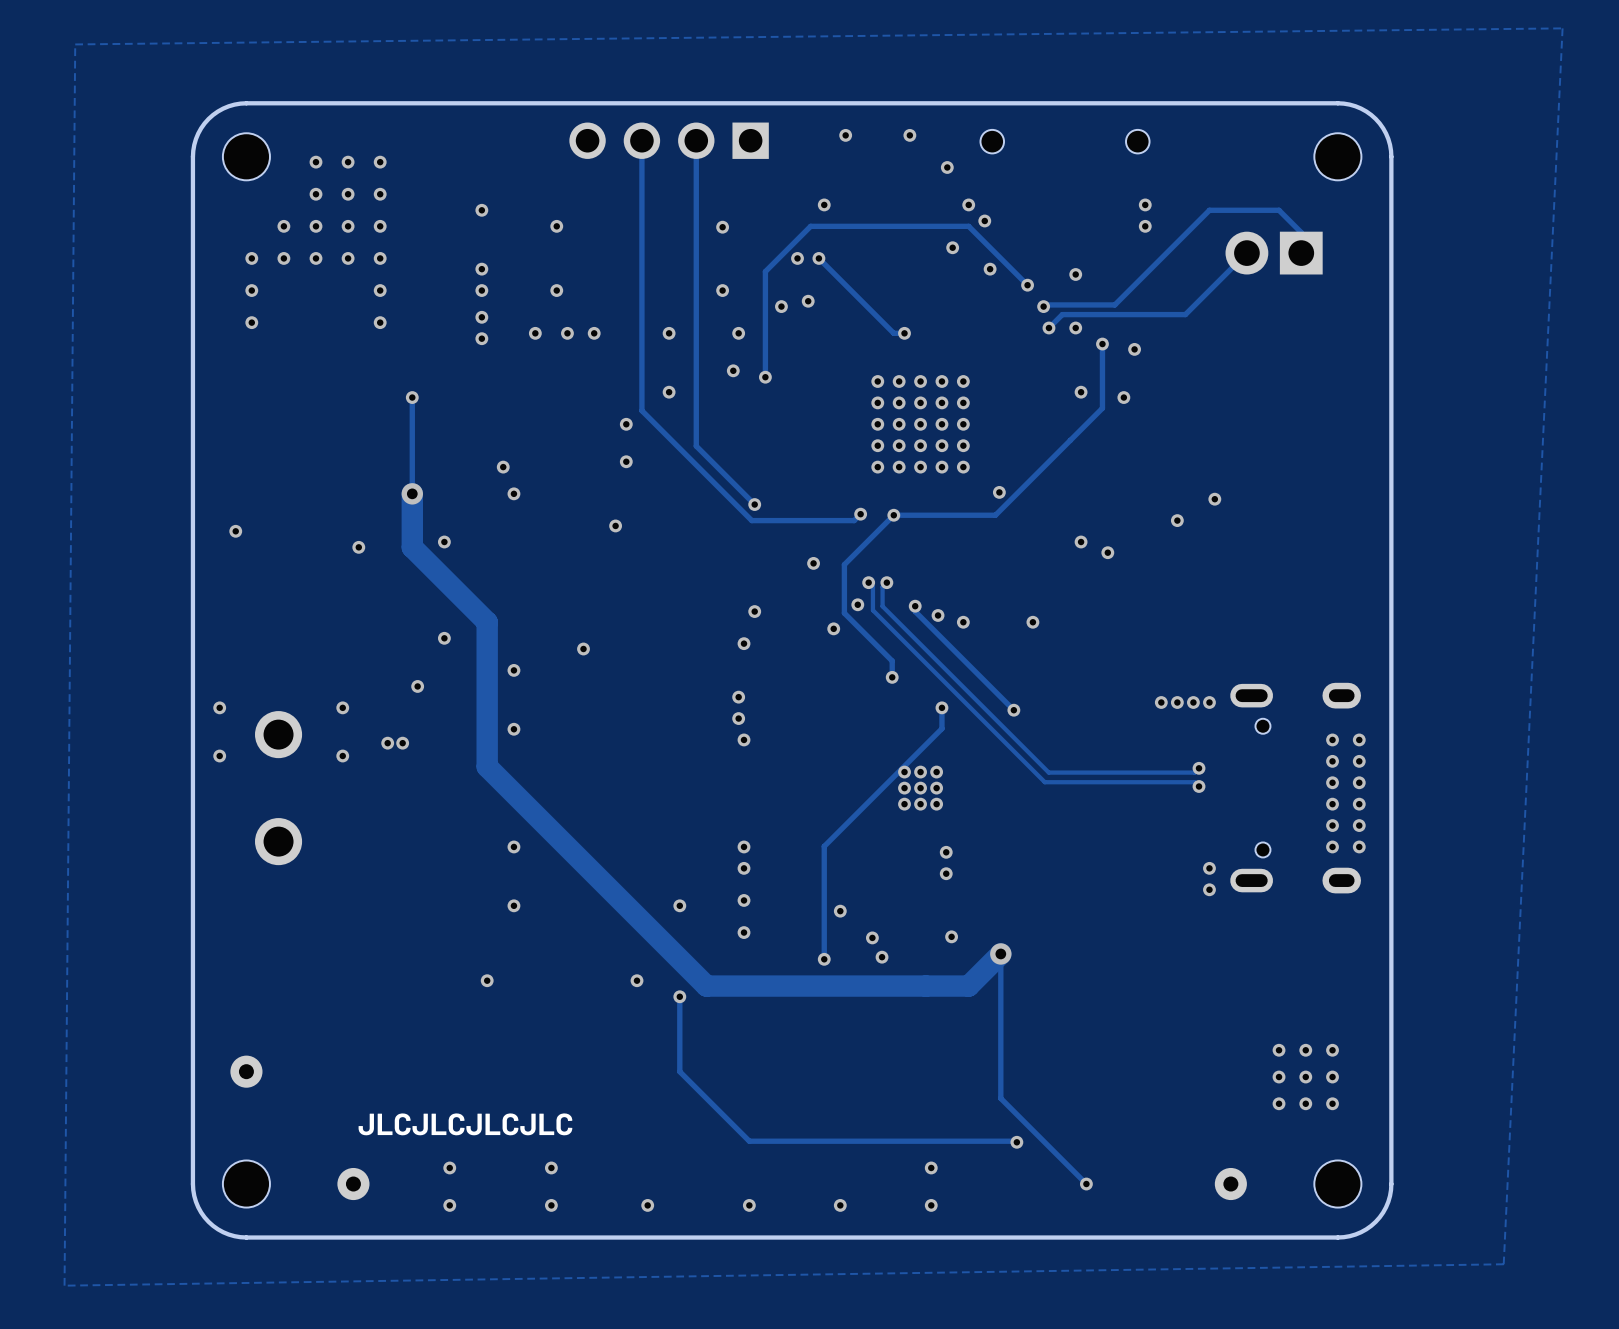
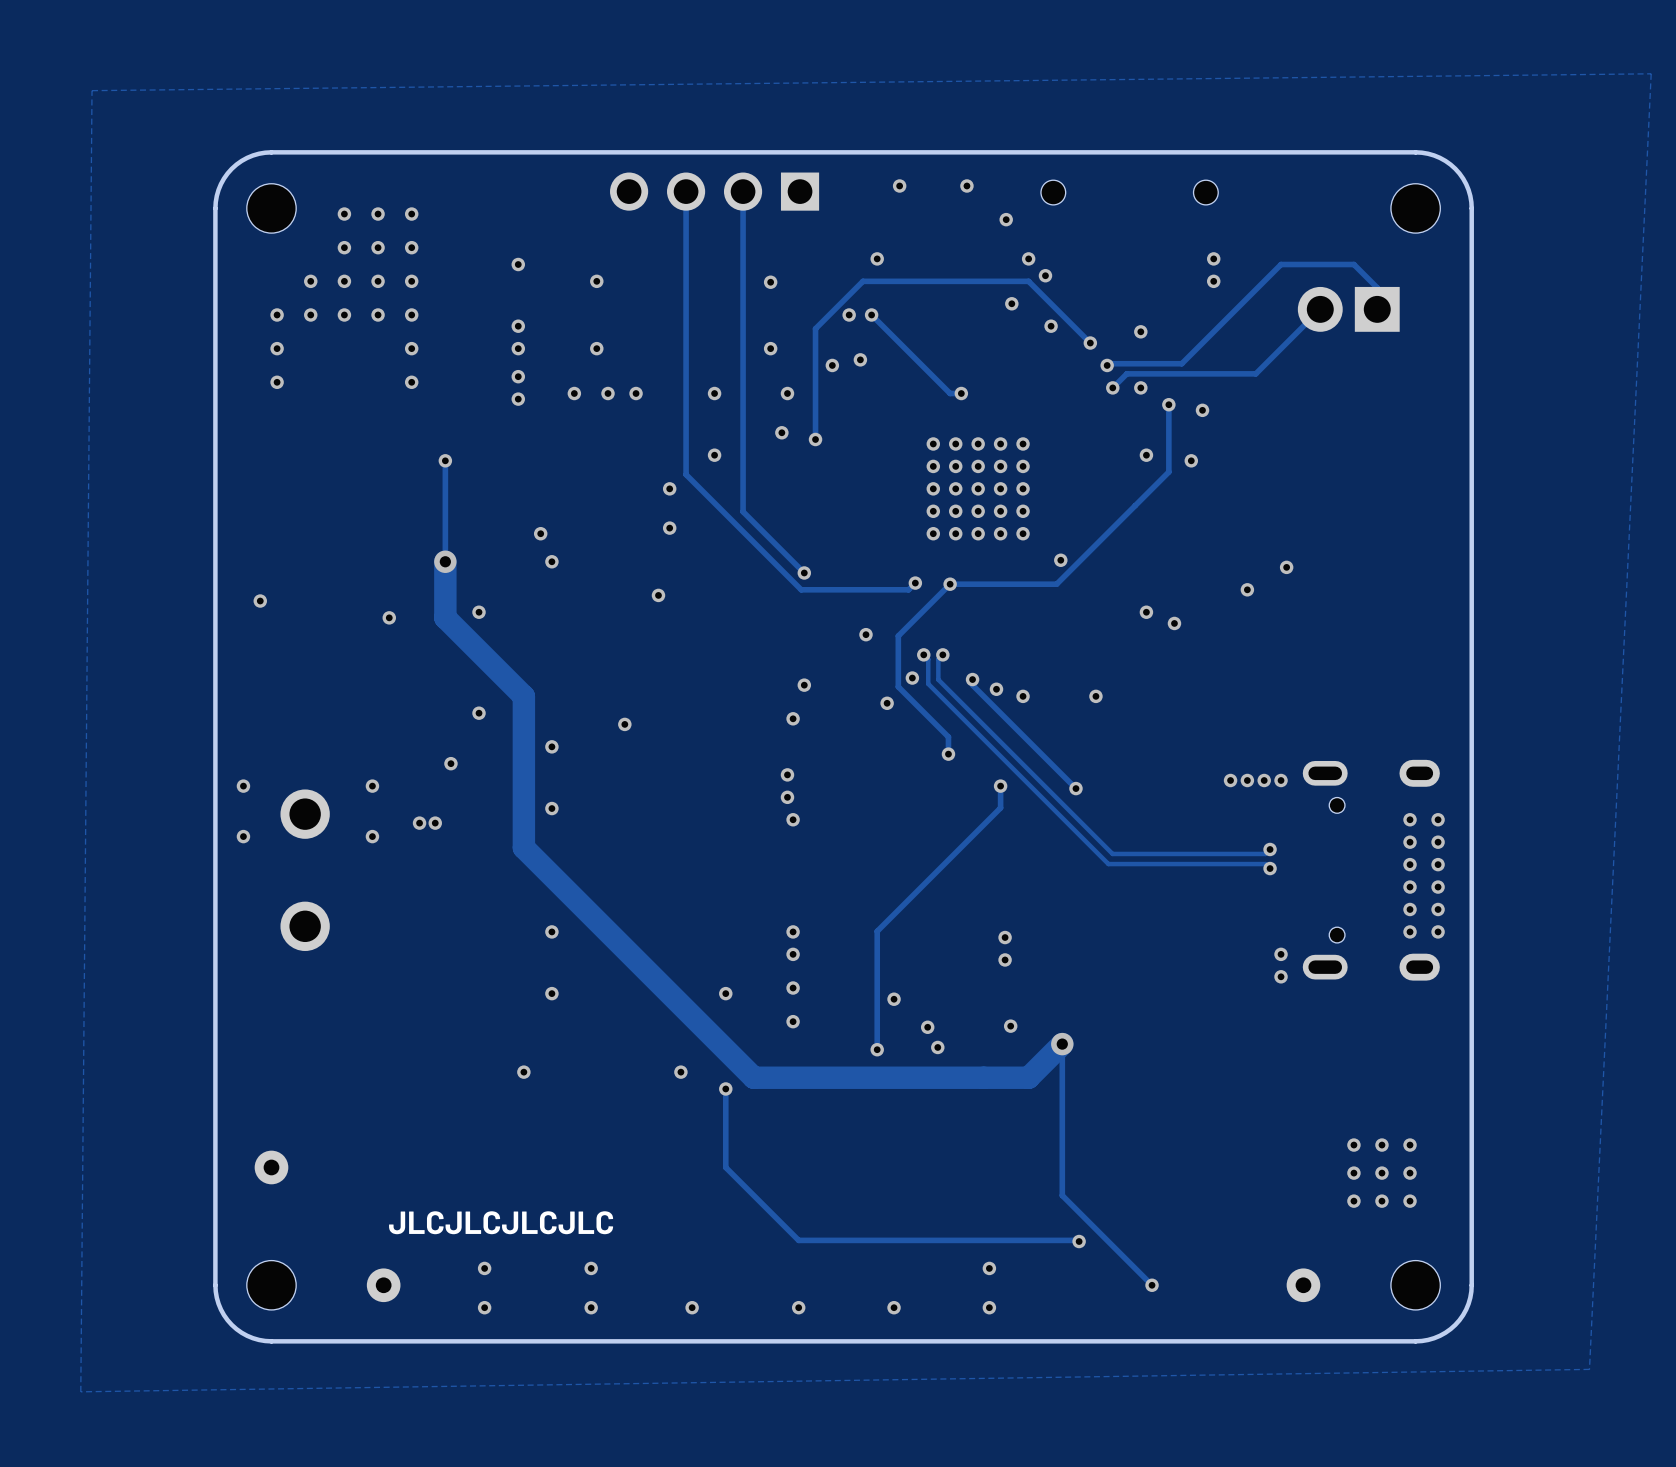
via: (904, 772) -> none
via: (920, 772) -> none
via: (936, 772) -> none
via: (904, 788) -> none
via: (920, 788) -> none
via: (936, 788) -> none
via: (904, 804) -> none
via: (920, 804) -> none
via: (936, 804) -> none

